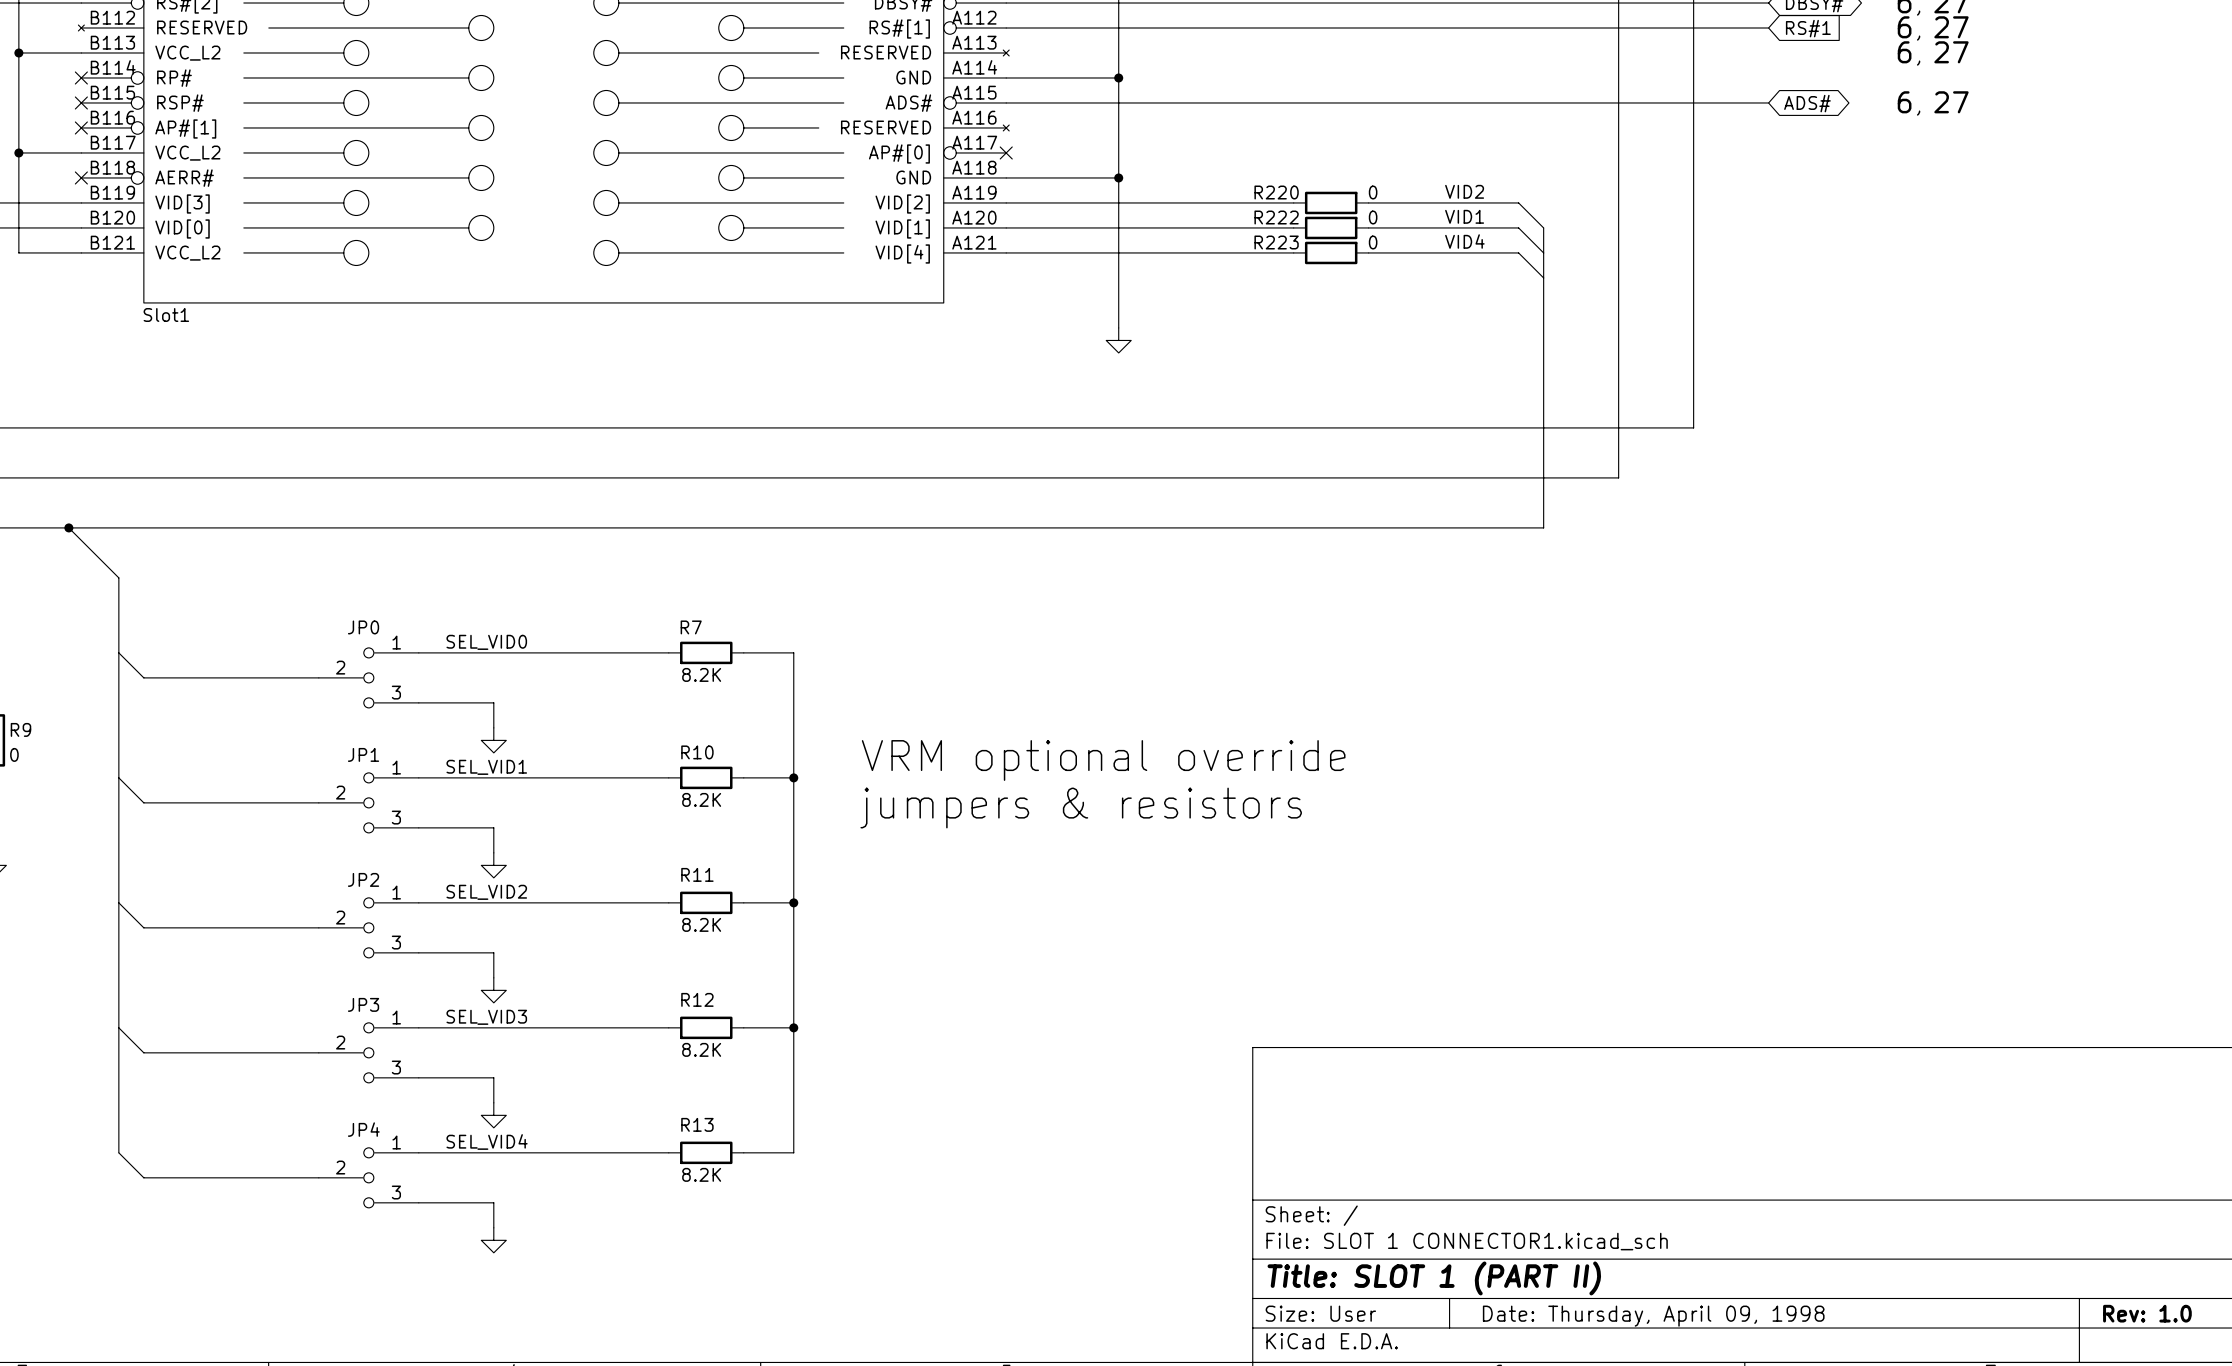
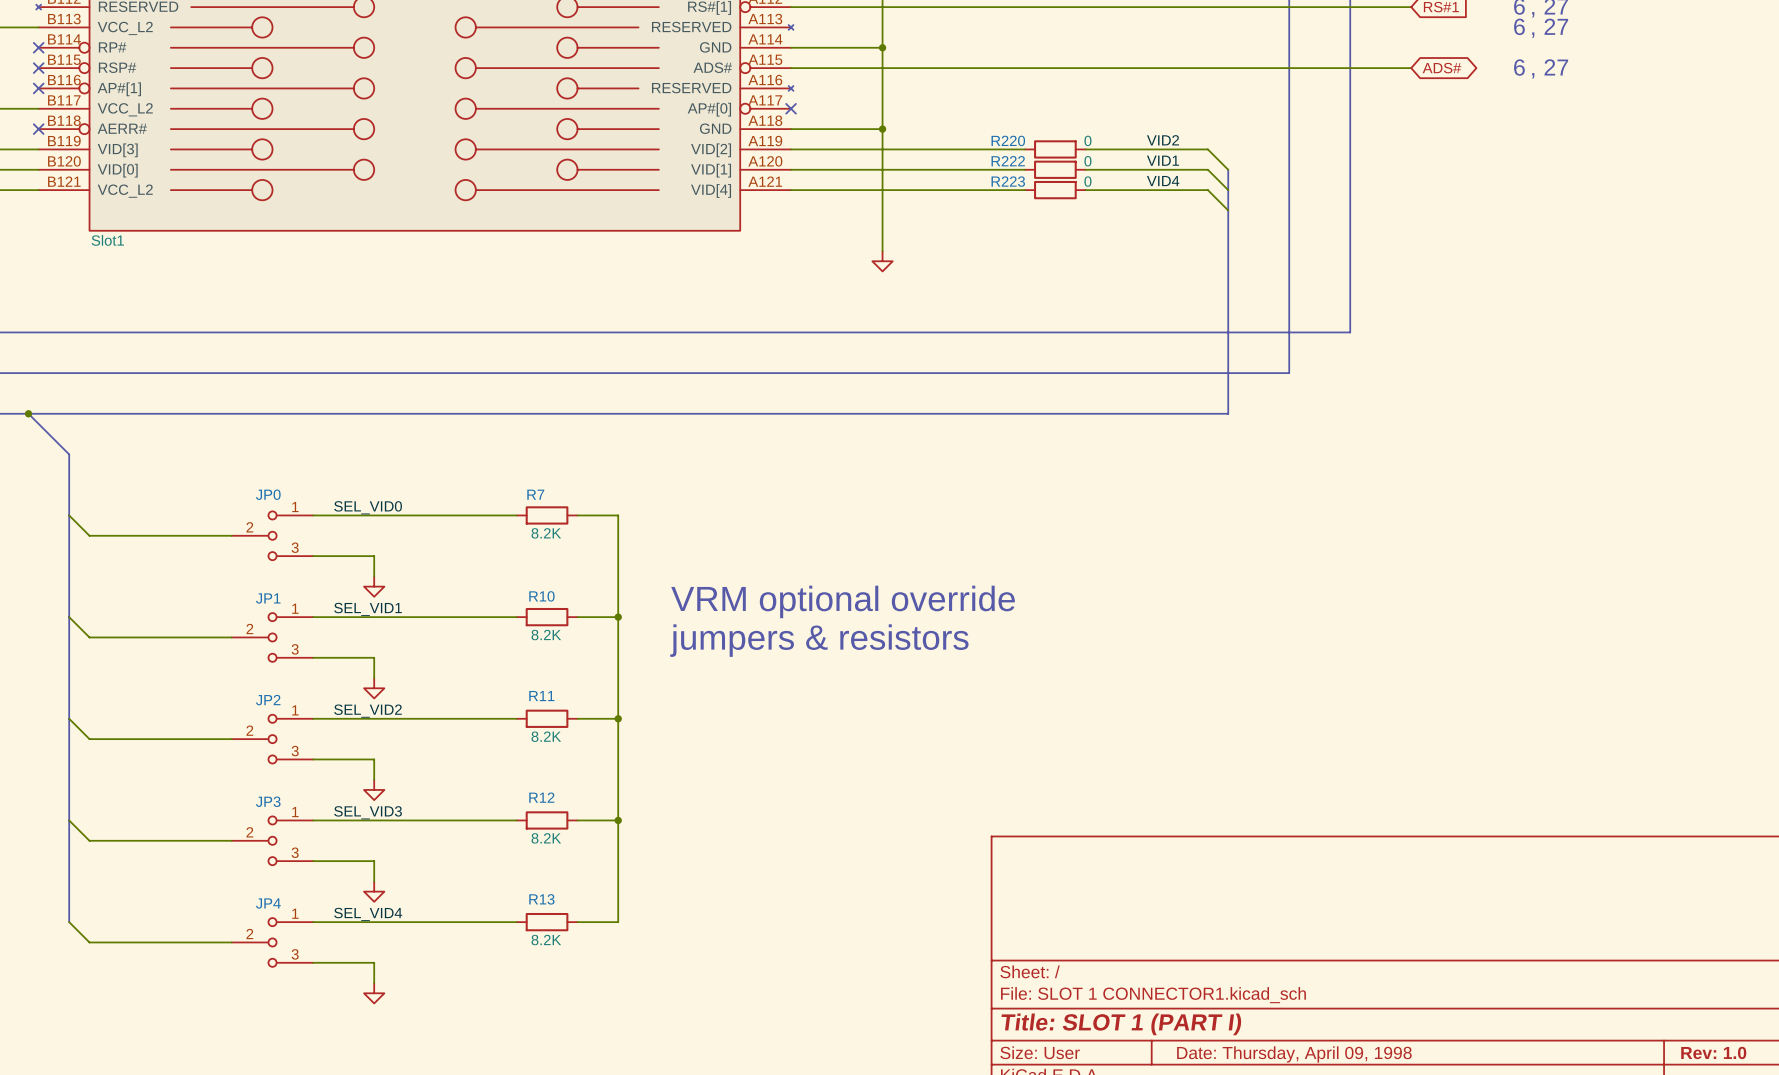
title block: Title: SLOT 1 (PART II) (1434, 1278) -> Title: SLOT 1 (PART I) (1121, 1024)

